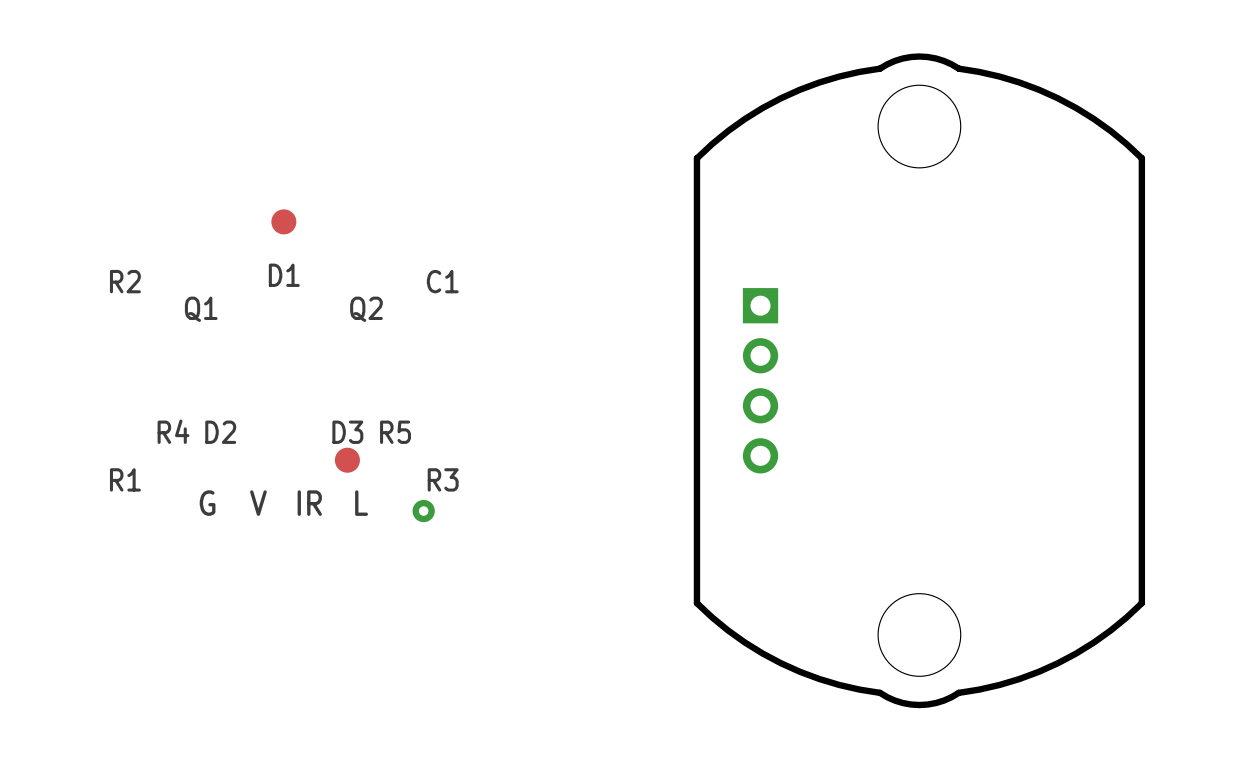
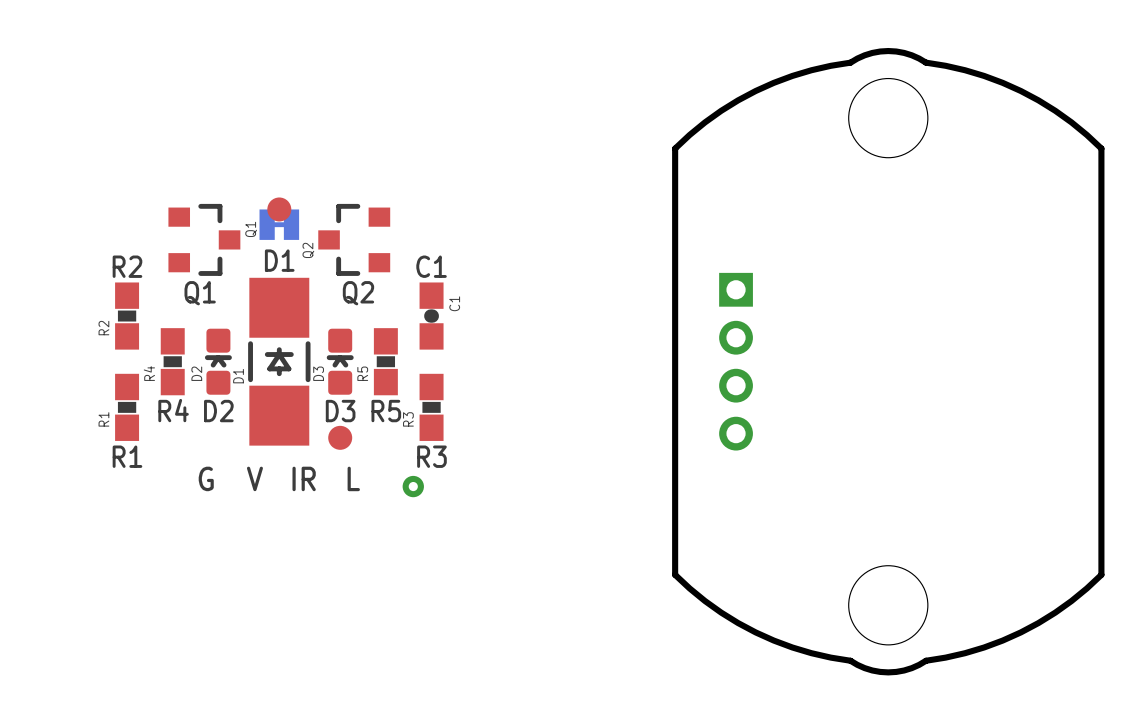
part: none -> (279, 224)
Q1: none -> (204, 239)
Q2: none -> (354, 239)
R2: none -> (127, 316)
C1: none -> (431, 316)
R4: none -> (172, 361)
D2: none -> (218, 361)
D1: none -> (279, 361)
D3: none -> (340, 361)
R5: none -> (385, 361)
R1: none -> (127, 407)
R3: none -> (431, 407)

